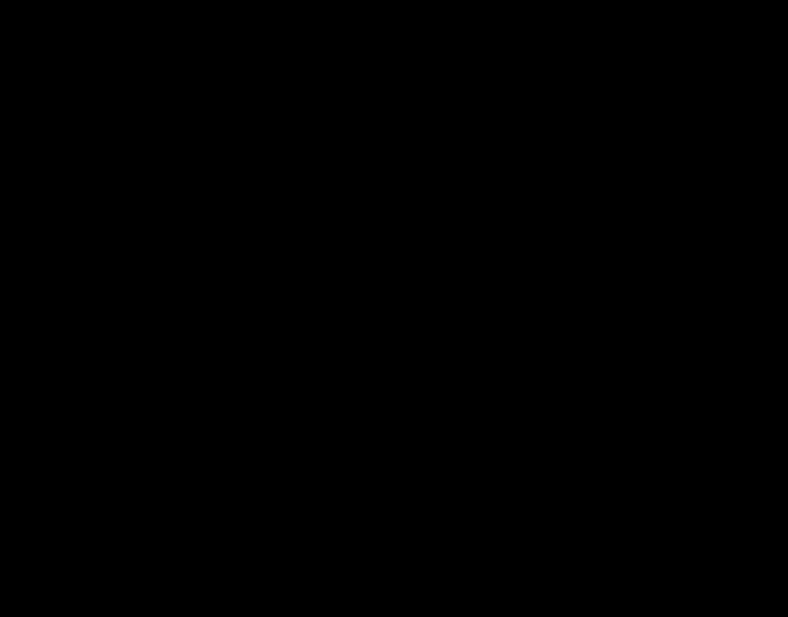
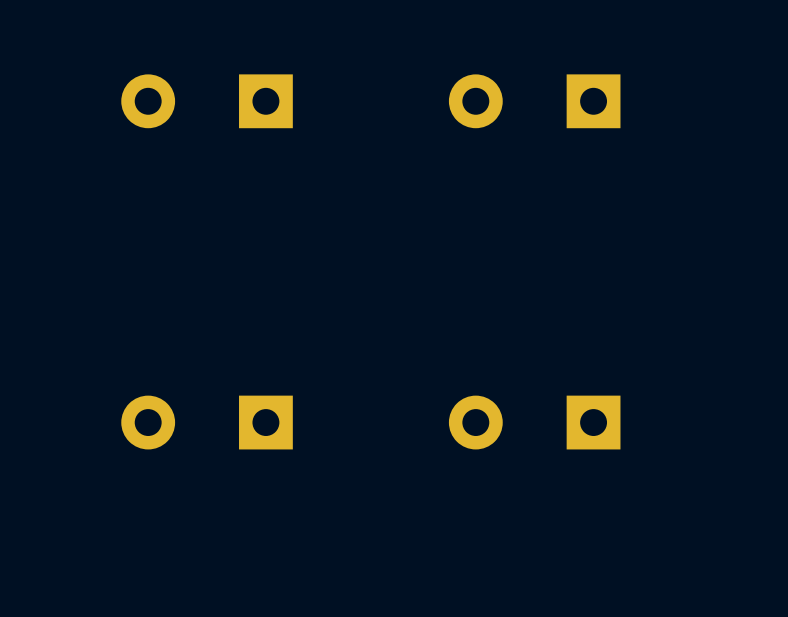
part: none -> (207, 101)
part: none -> (534, 101)
part: none -> (207, 422)
part: none -> (534, 422)

